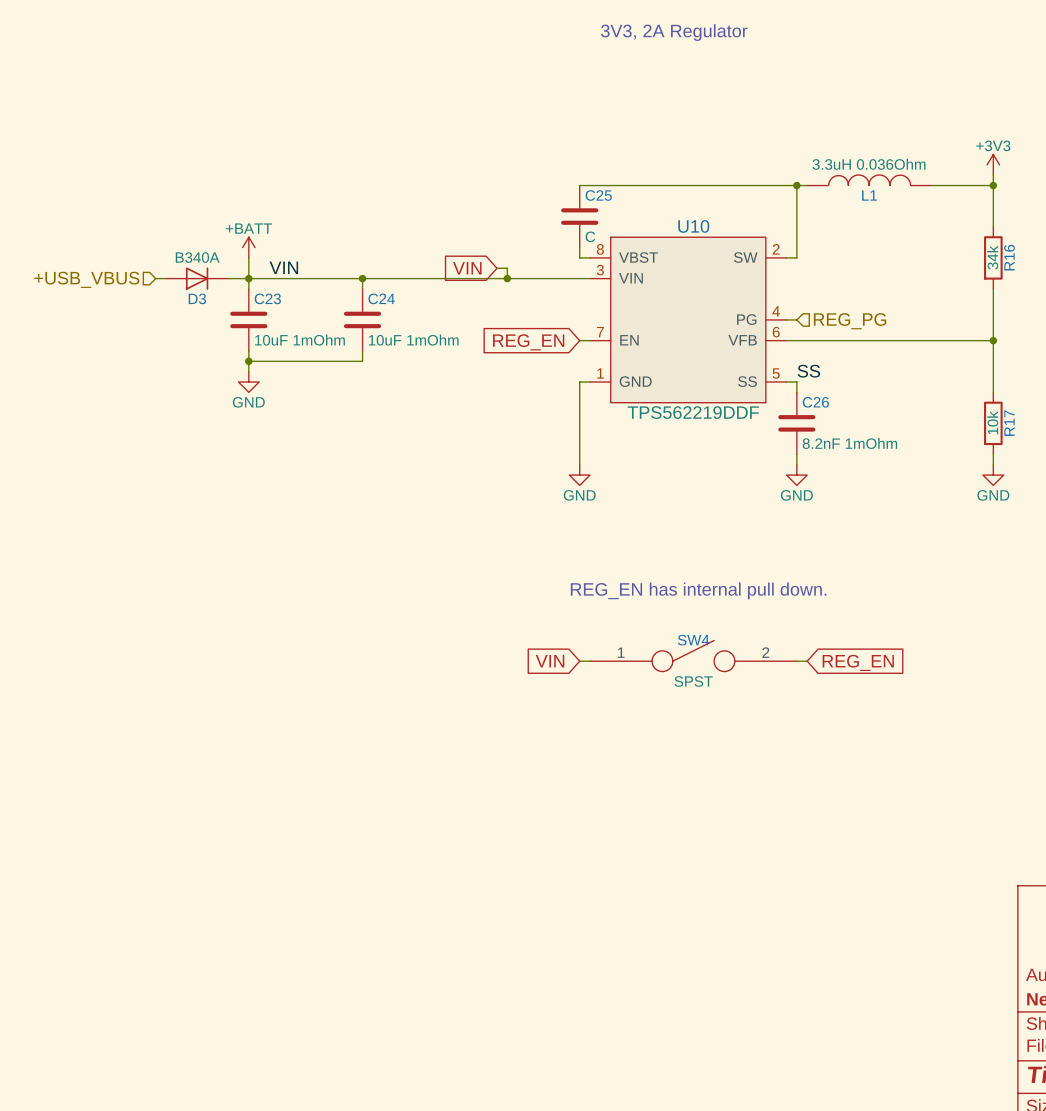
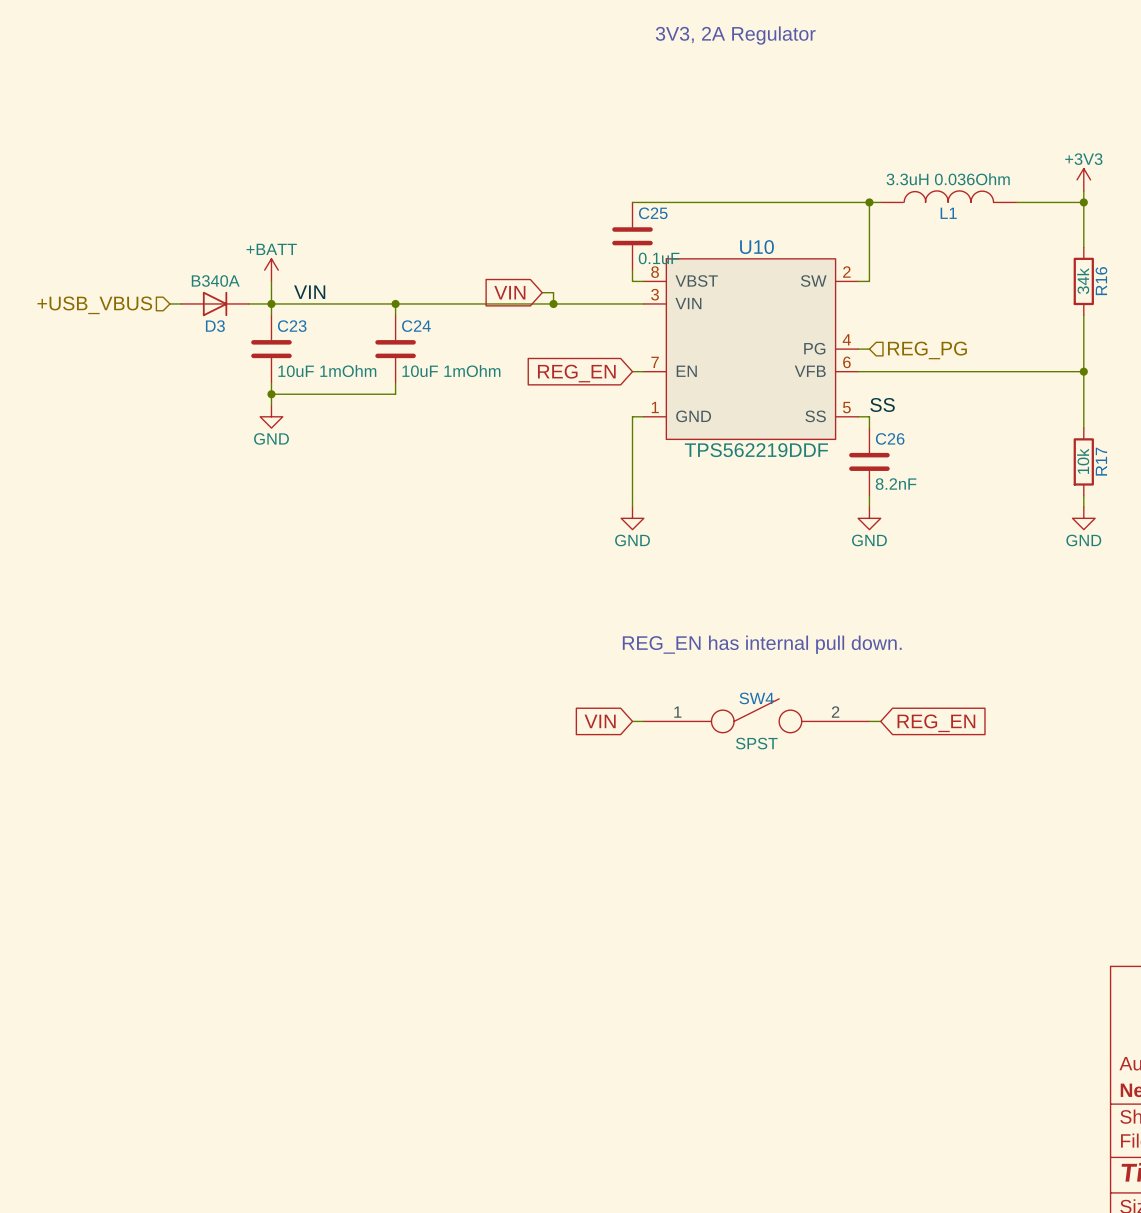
C25 value: C (590, 236) -> 0.1uF (659, 258)
C26 value: 8.2nF 1mOhm (849, 443) -> 8.2nF (896, 484)

